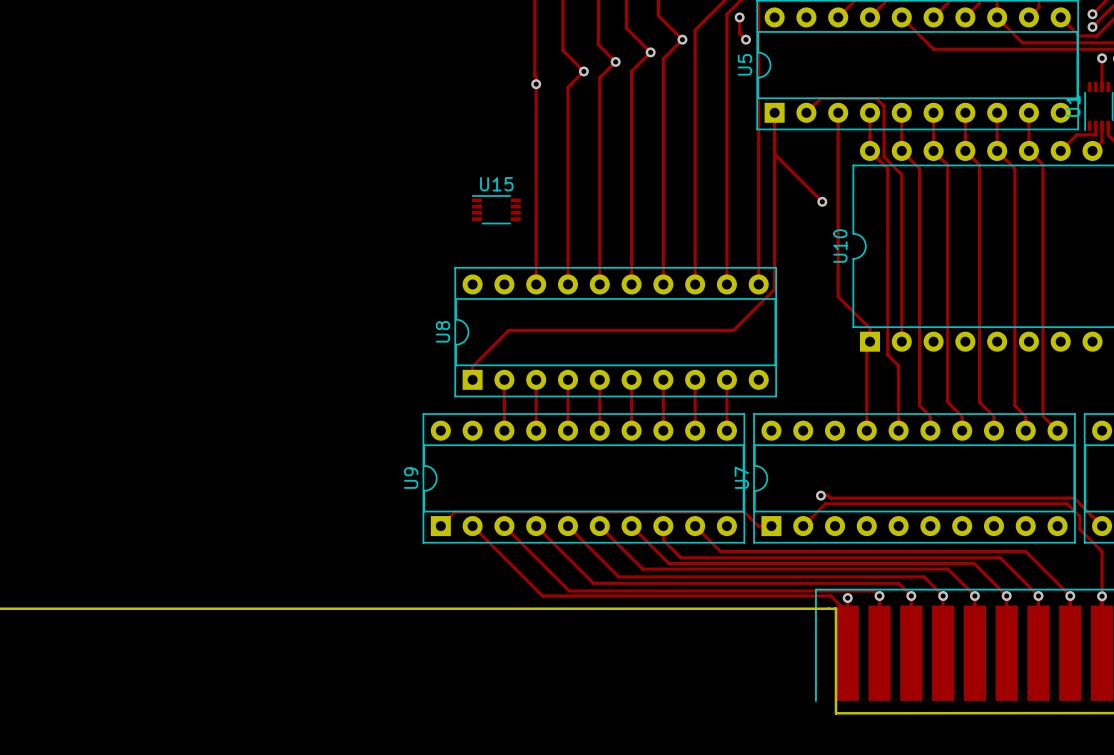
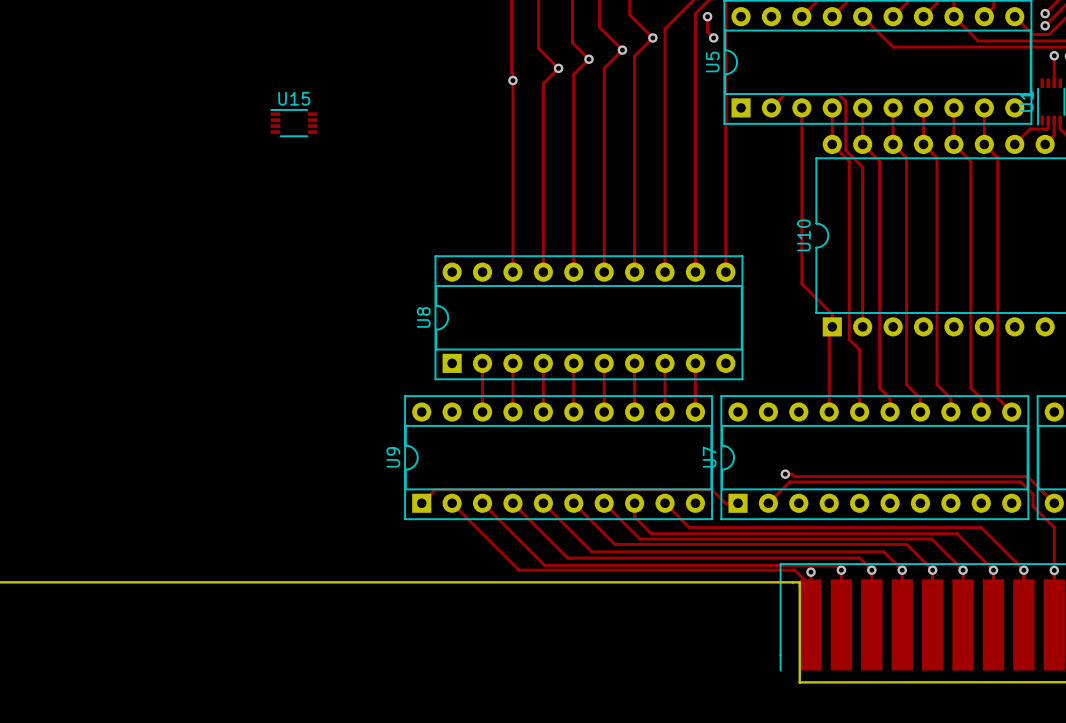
track: (774, 112) (774, 289) (733, 330) (508, 330) (472, 366) (472, 379) -> none
track: (774, 154) (822, 201) -> none
via: (822, 201) -> none
U15 position: (496, 209) -> (293, 123)

